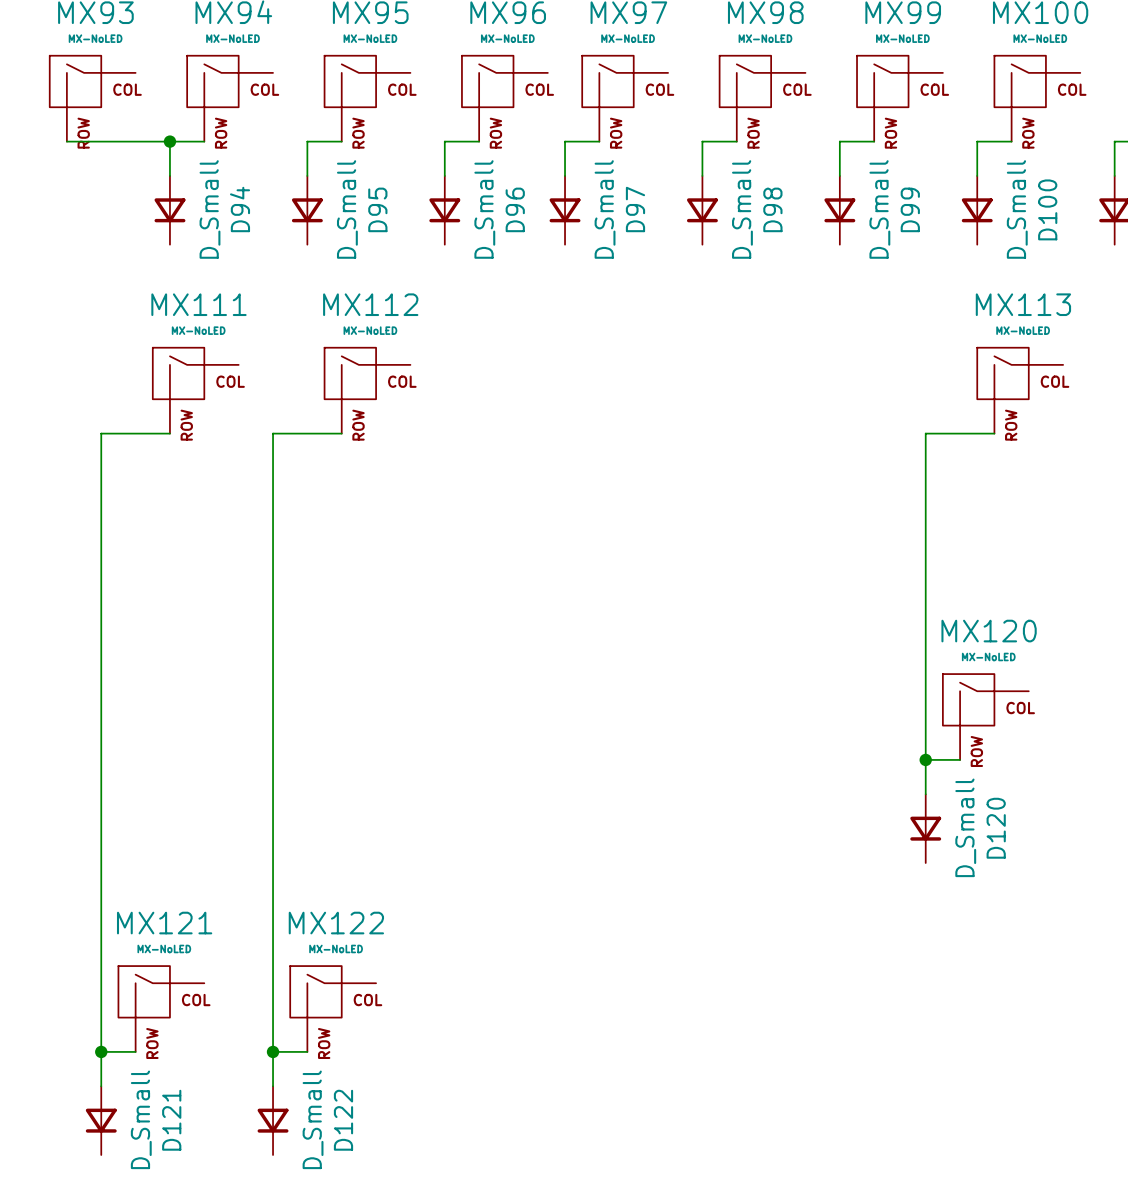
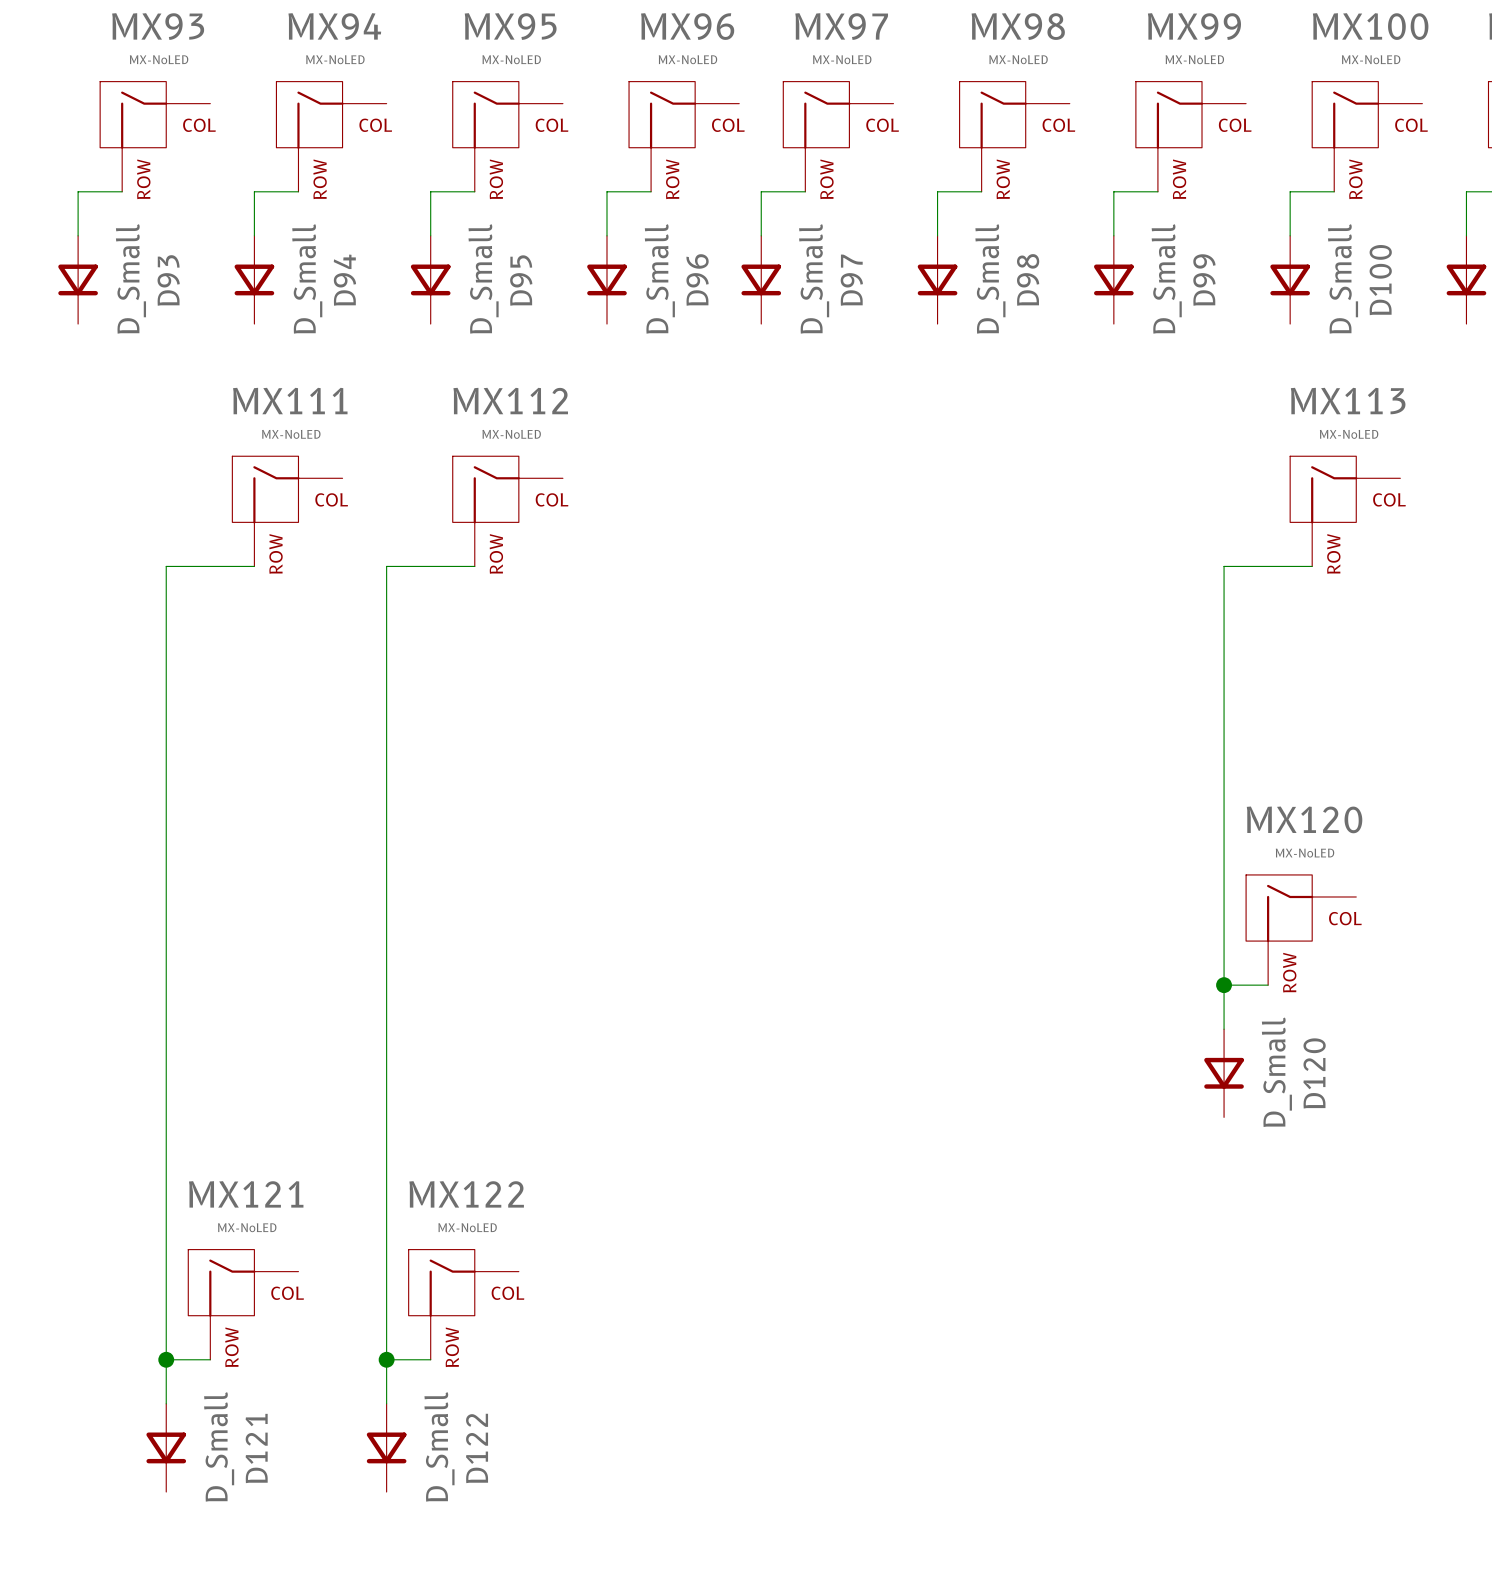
wire: (66, 141) (169, 141) -> (122, 191) (78, 191) (78, 235)
junction: (169, 141) -> none
D93: none -> D_Small (78, 279)

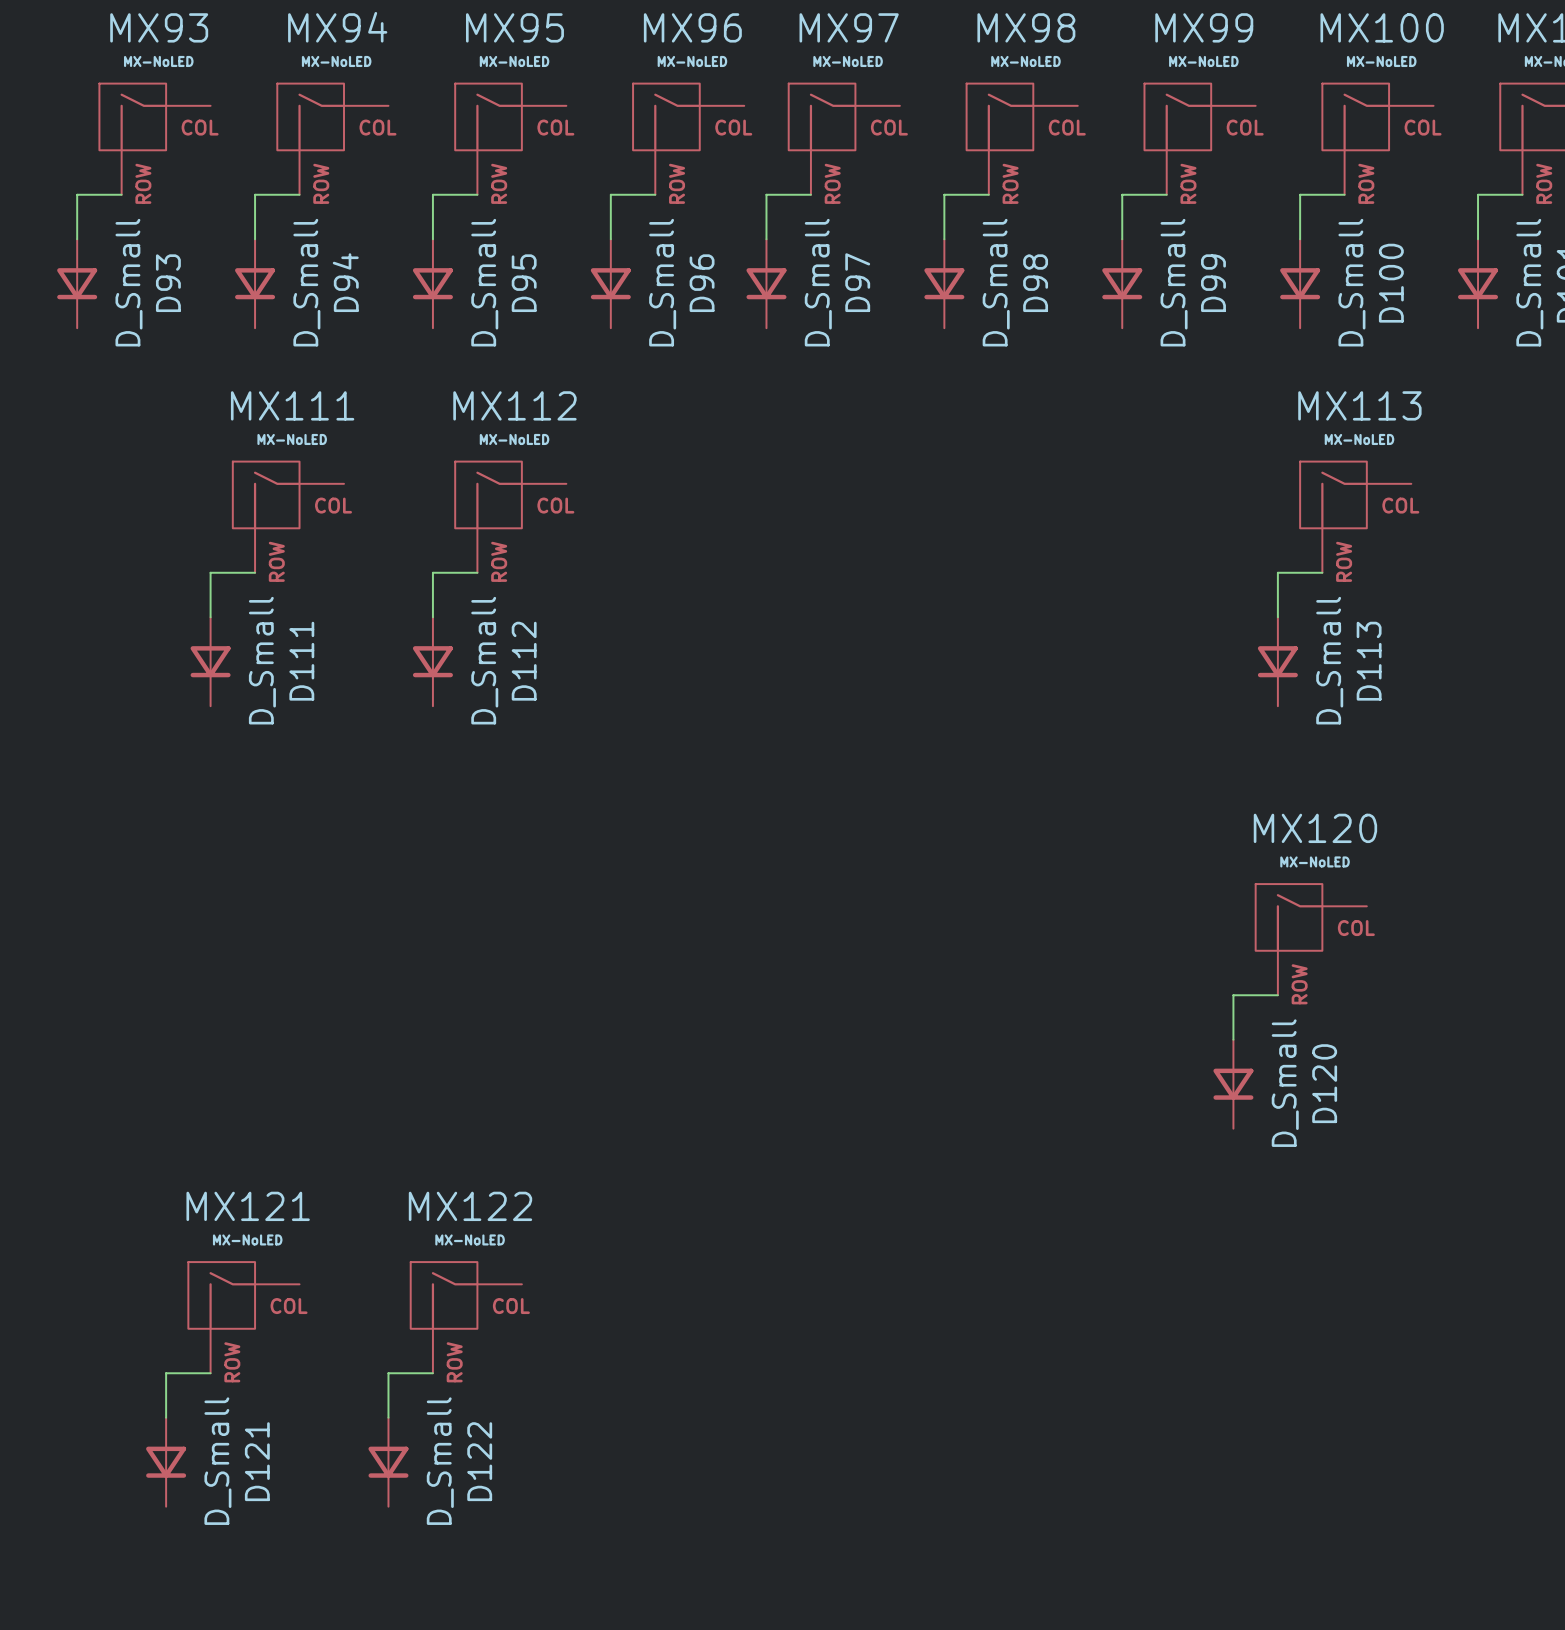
wire: (210, 566) (166, 566) (166, 1359) -> (210, 572) (210, 617)
wire: (430, 566) (386, 566) (386, 1359) -> (432, 572) (432, 617)
wire: (1268, 566) (1224, 566) (1224, 985) -> (1277, 572) (1277, 617)
D111: none -> D_Small (210, 661)
D112: none -> D_Small (432, 661)
D113: none -> D_Small (1277, 661)
junction: (1224, 985) -> none
junction: (166, 1359) -> none
junction: (386, 1359) -> none

